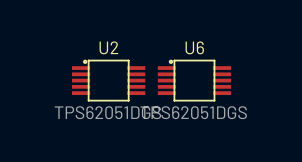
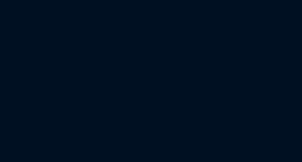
U2: TPS62051DGS (108, 80) -> none
U6: TPS62051DGS (194, 80) -> none

